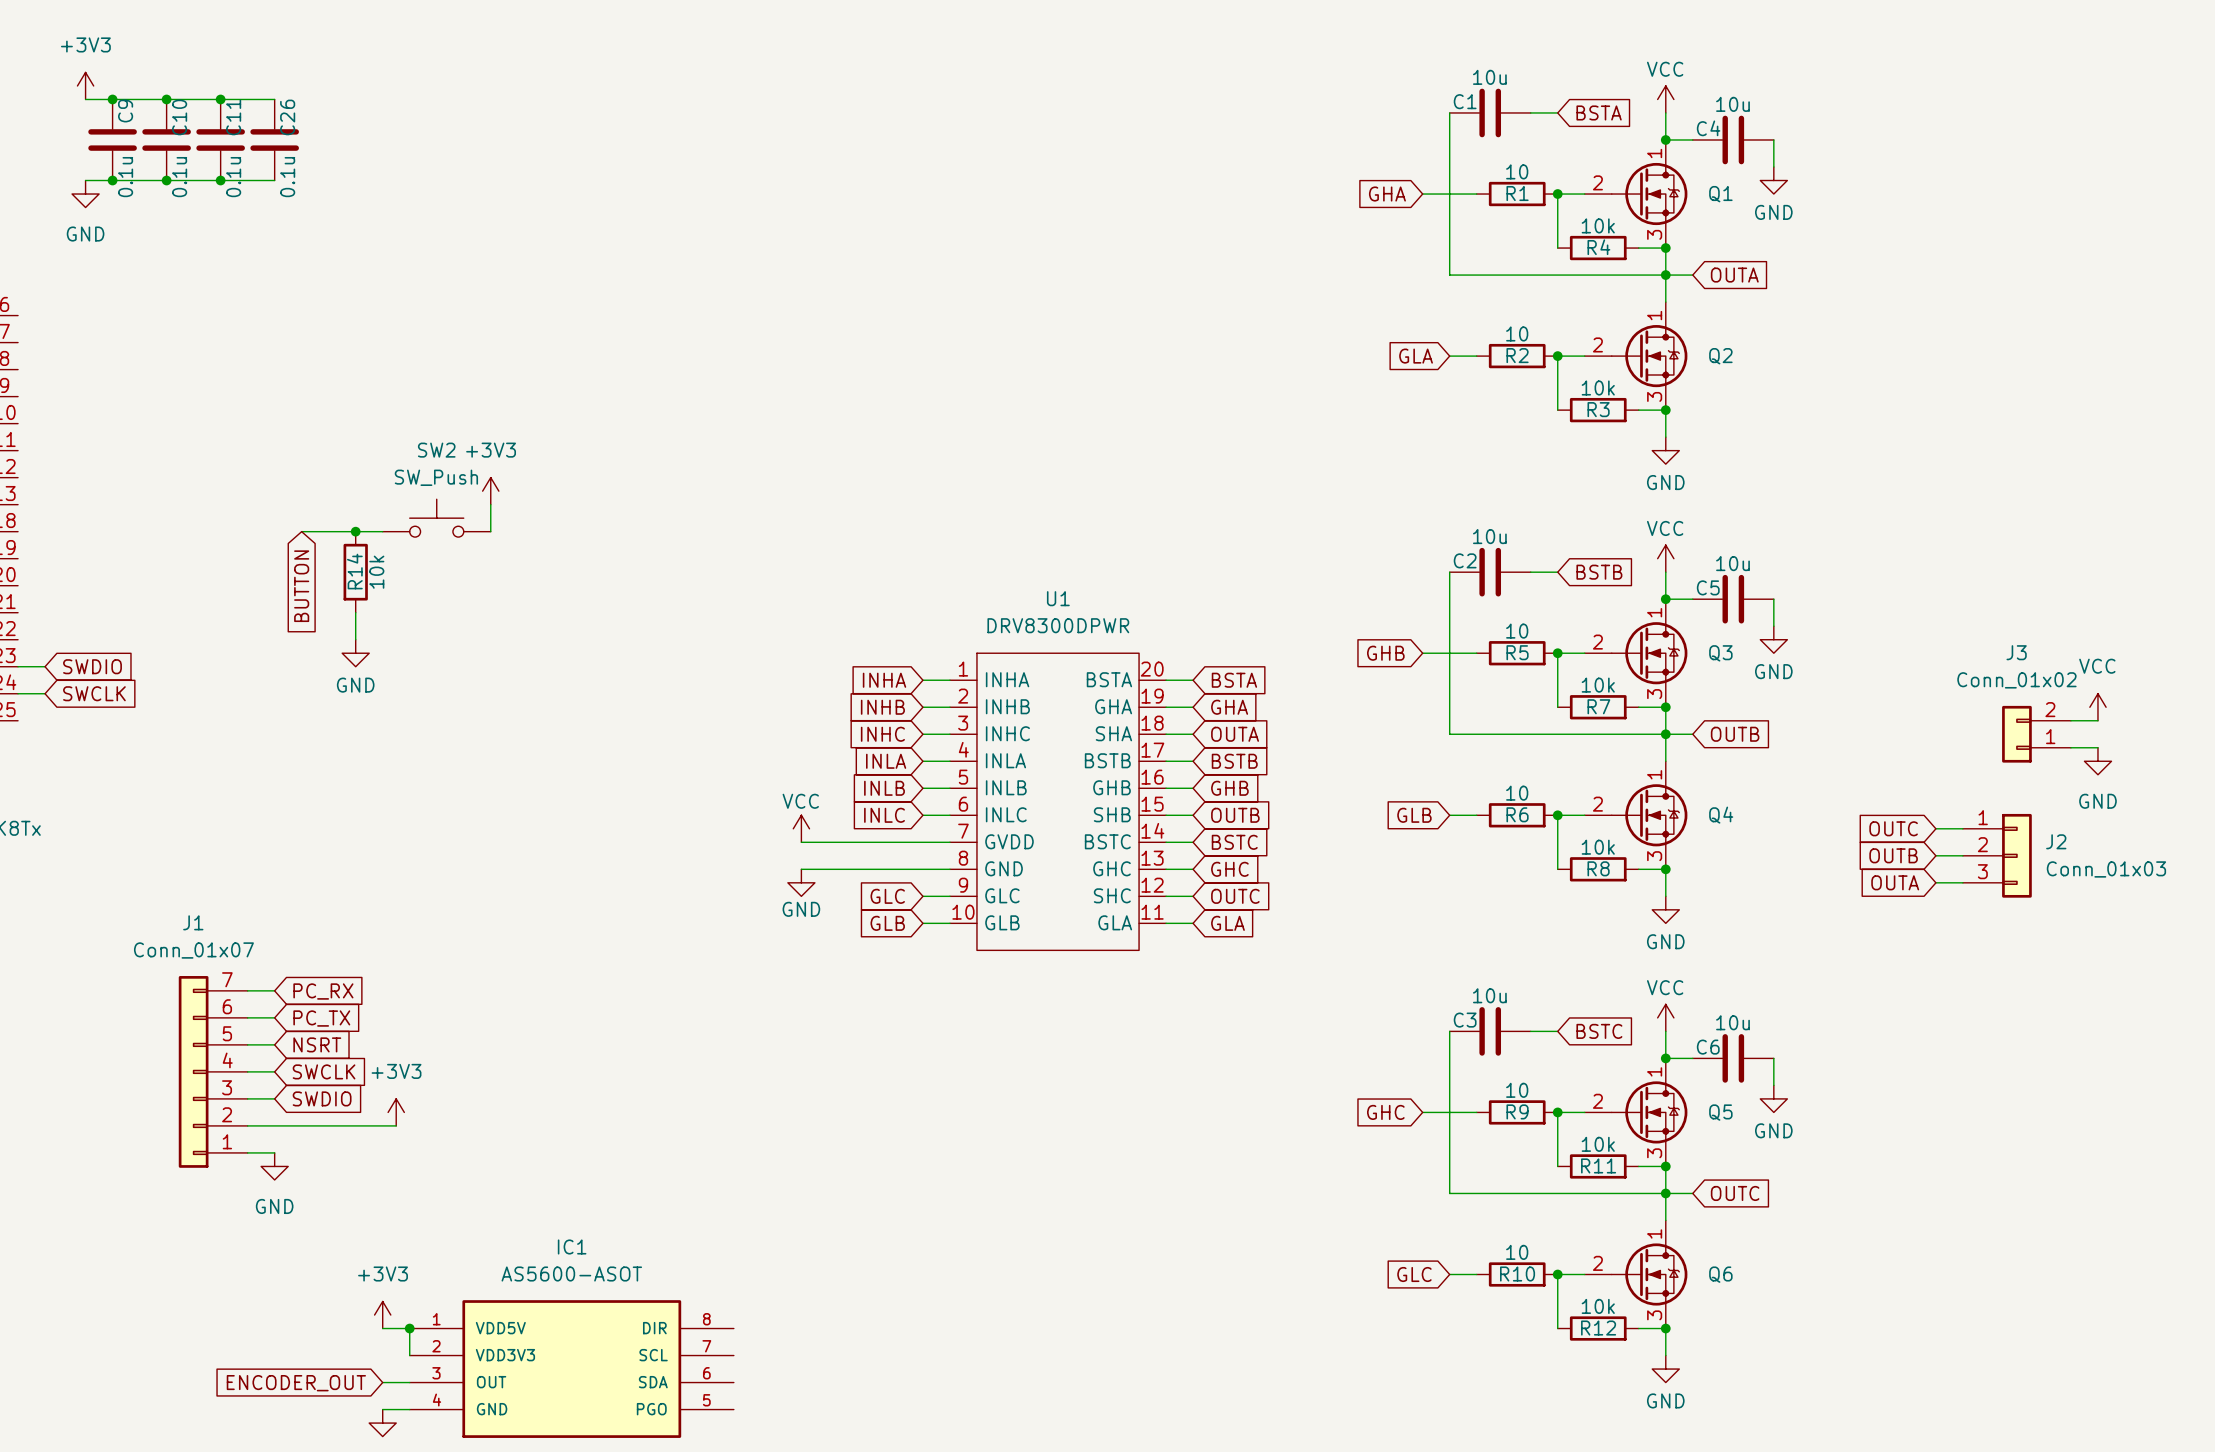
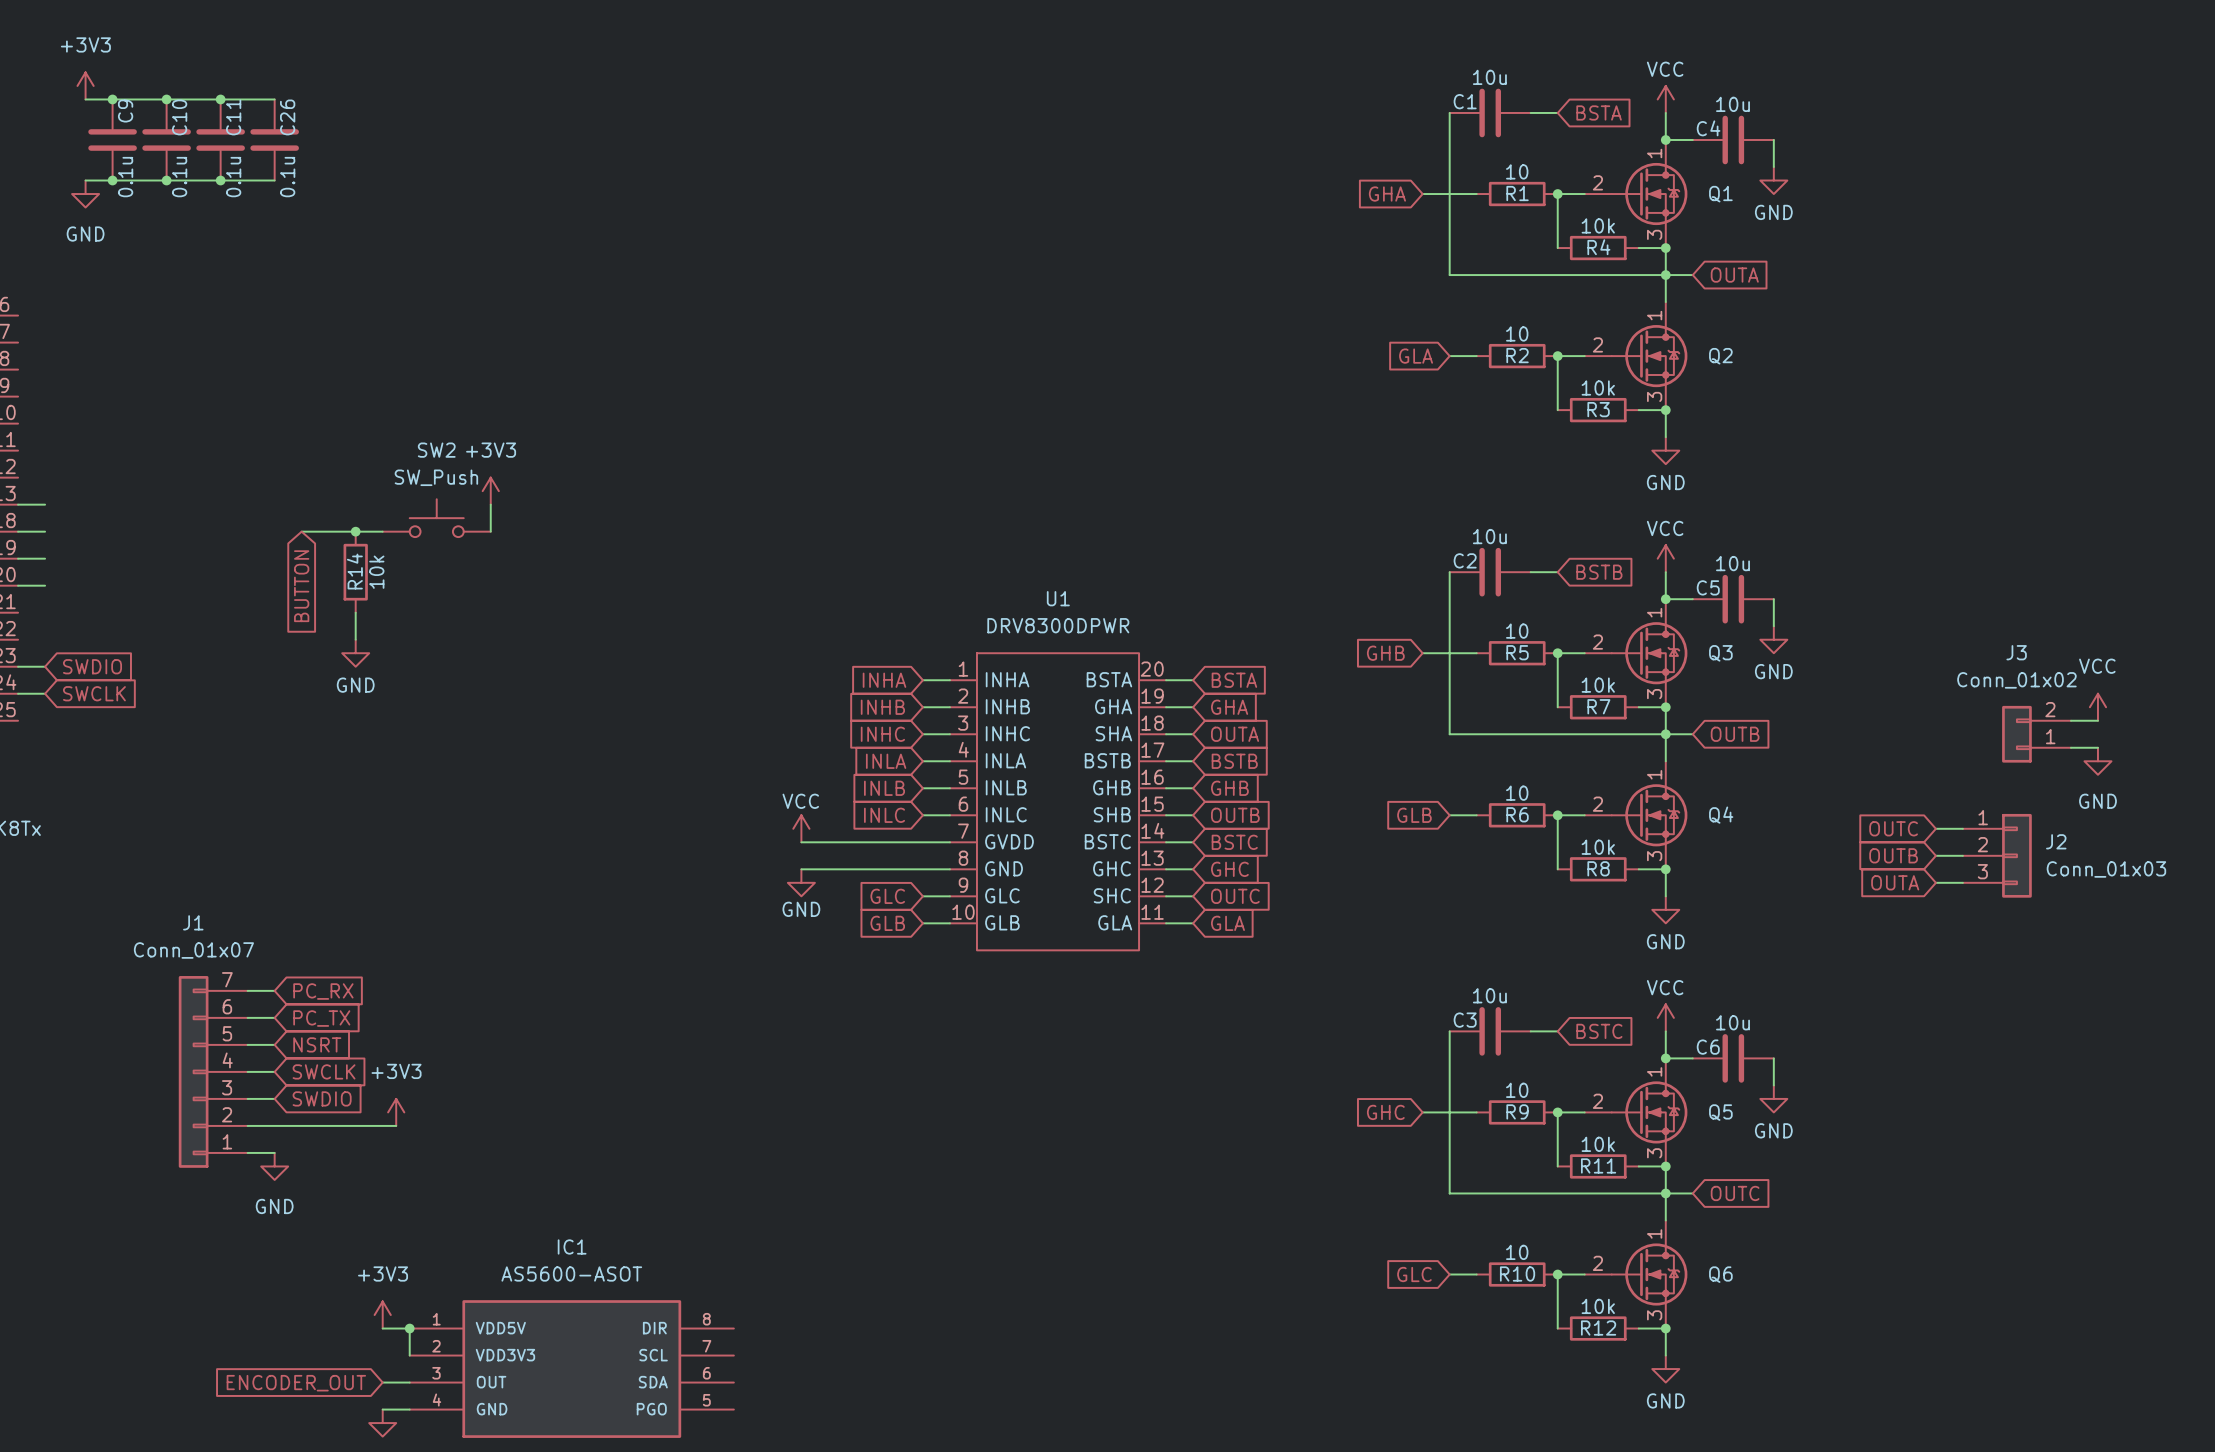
wire: none -> (18, 504) (45, 504)
wire: none -> (18, 531) (45, 531)
wire: none -> (18, 558) (45, 558)
wire: none -> (18, 585) (45, 585)

